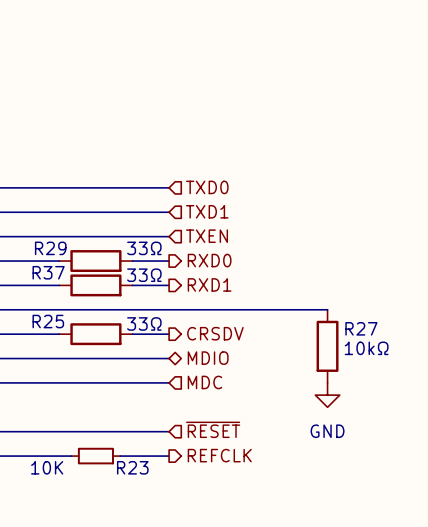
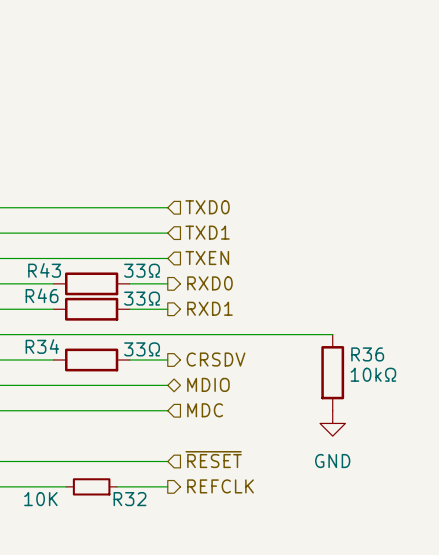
R29 name: R29 (50, 248) -> R43 (44, 270)
R37 name: R37 (48, 272) -> R46 (42, 295)
R25 name: R25 (48, 321) -> R34 (42, 346)
R27 name: R27 (361, 328) -> R36 (367, 354)
R23 name: R23 (132, 467) -> R32 (130, 499)

